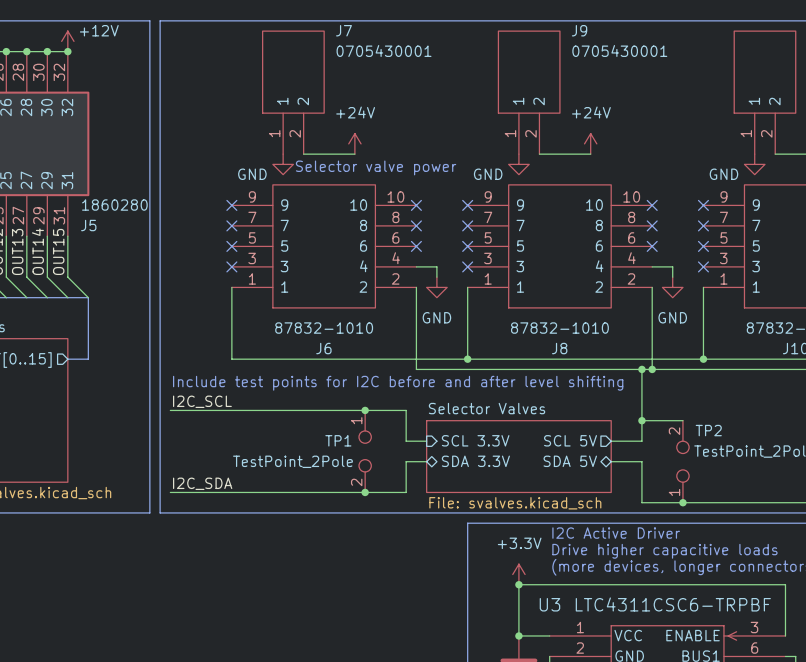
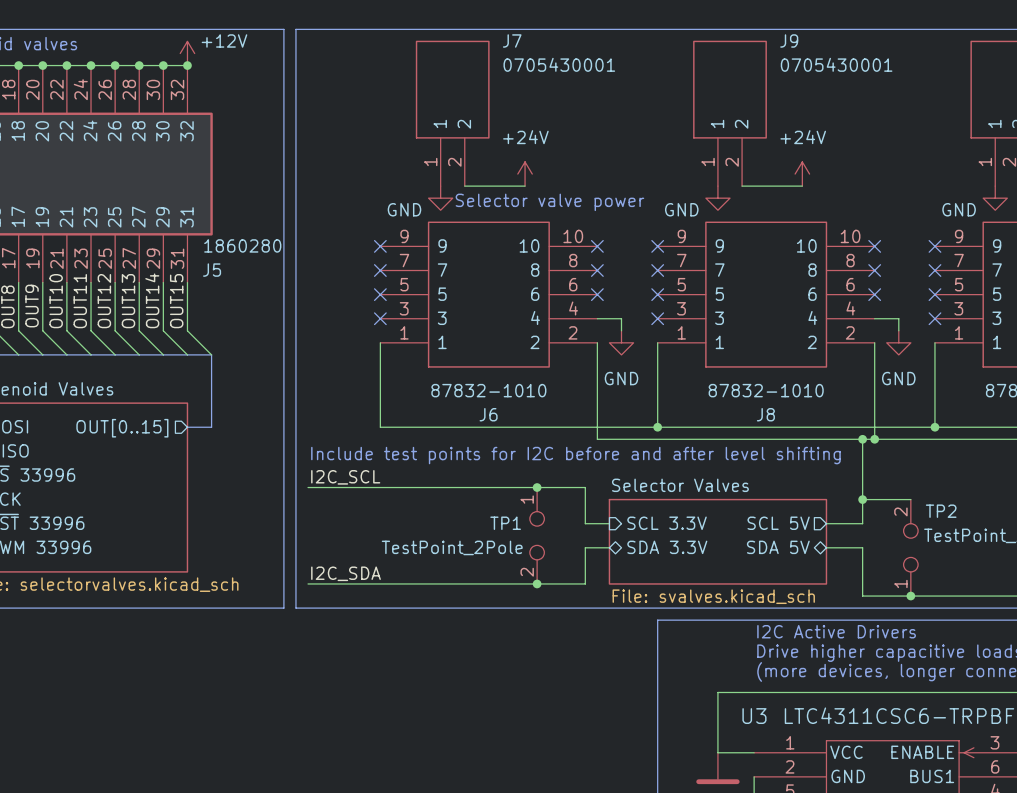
text: I2C Active Driver (616, 533) -> I2C Active Drivers (836, 631)
power symbol: +3.3V (518, 574) -> none
junction: (518, 584) -> none
junction: (518, 635) -> none

